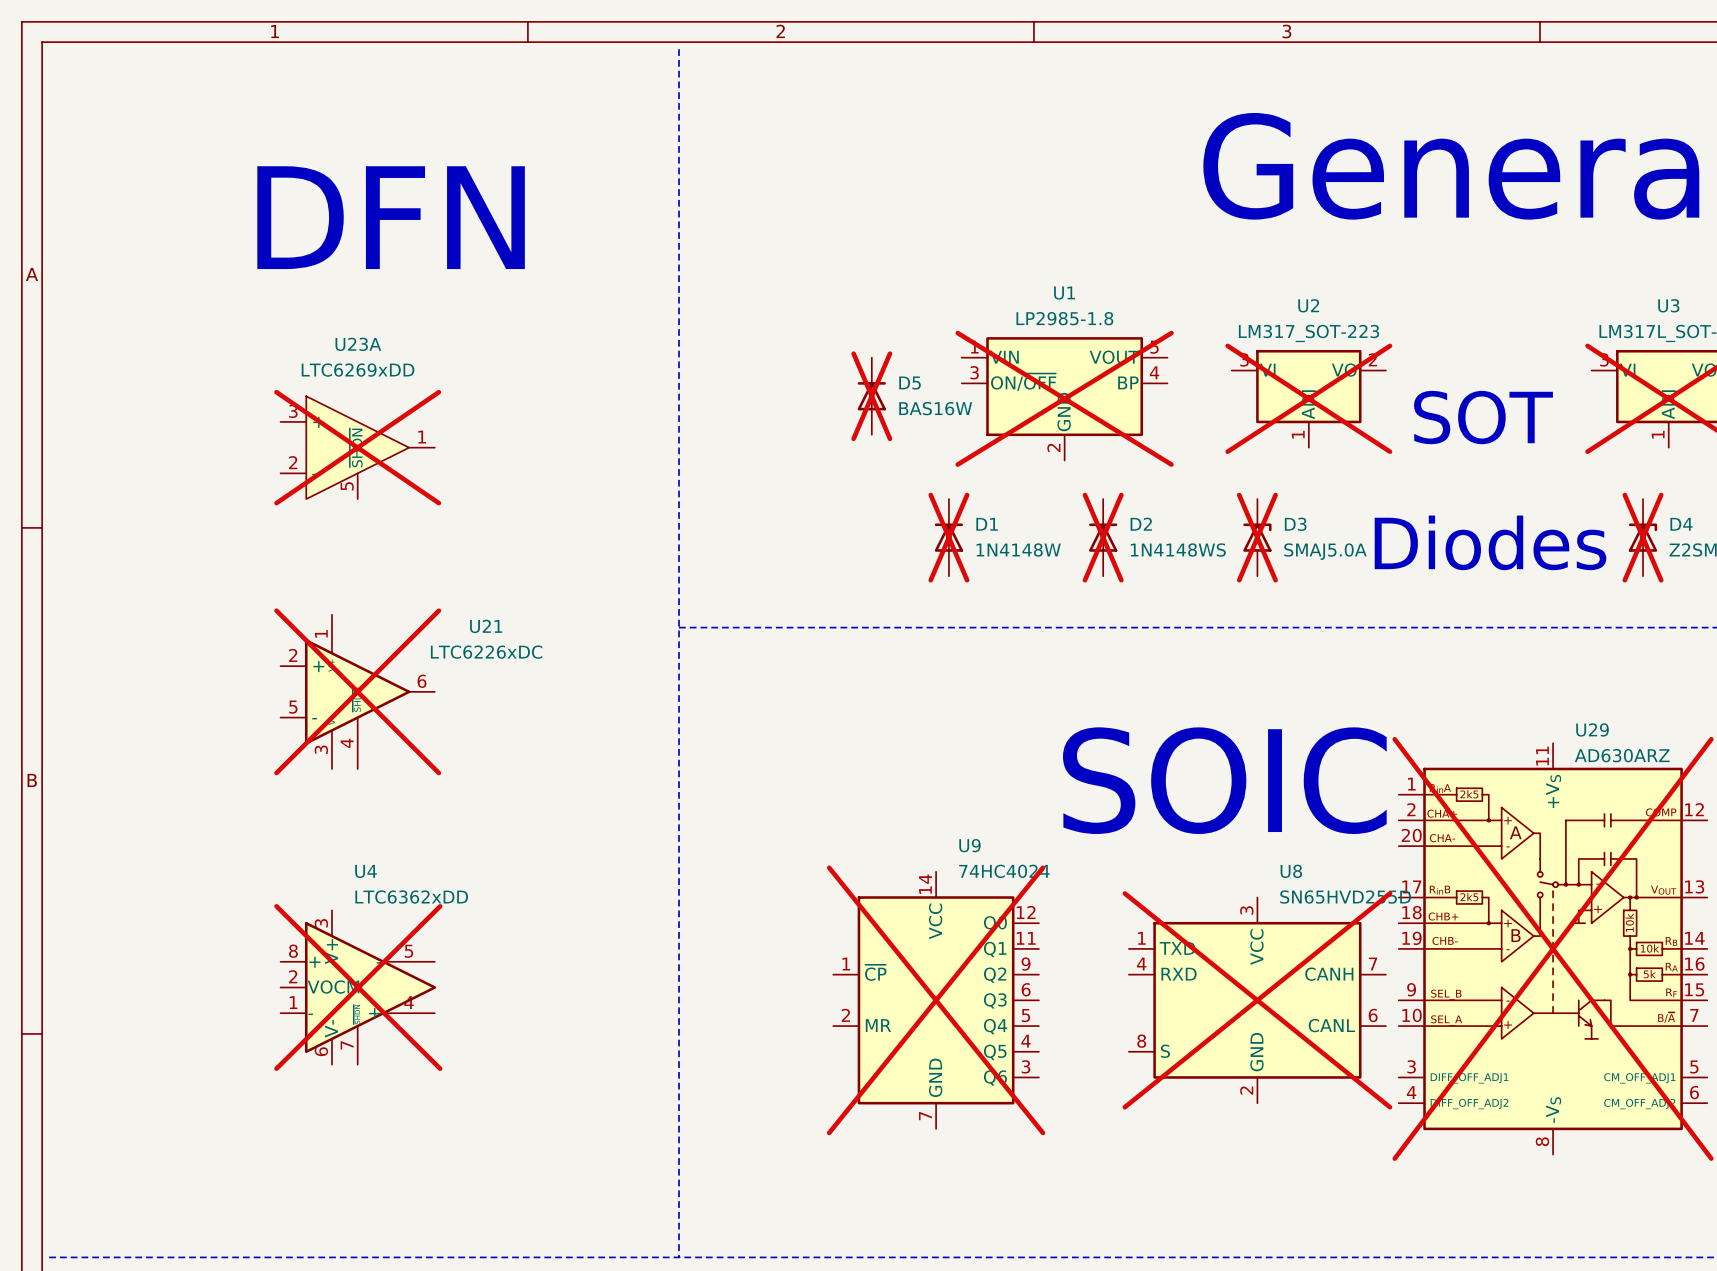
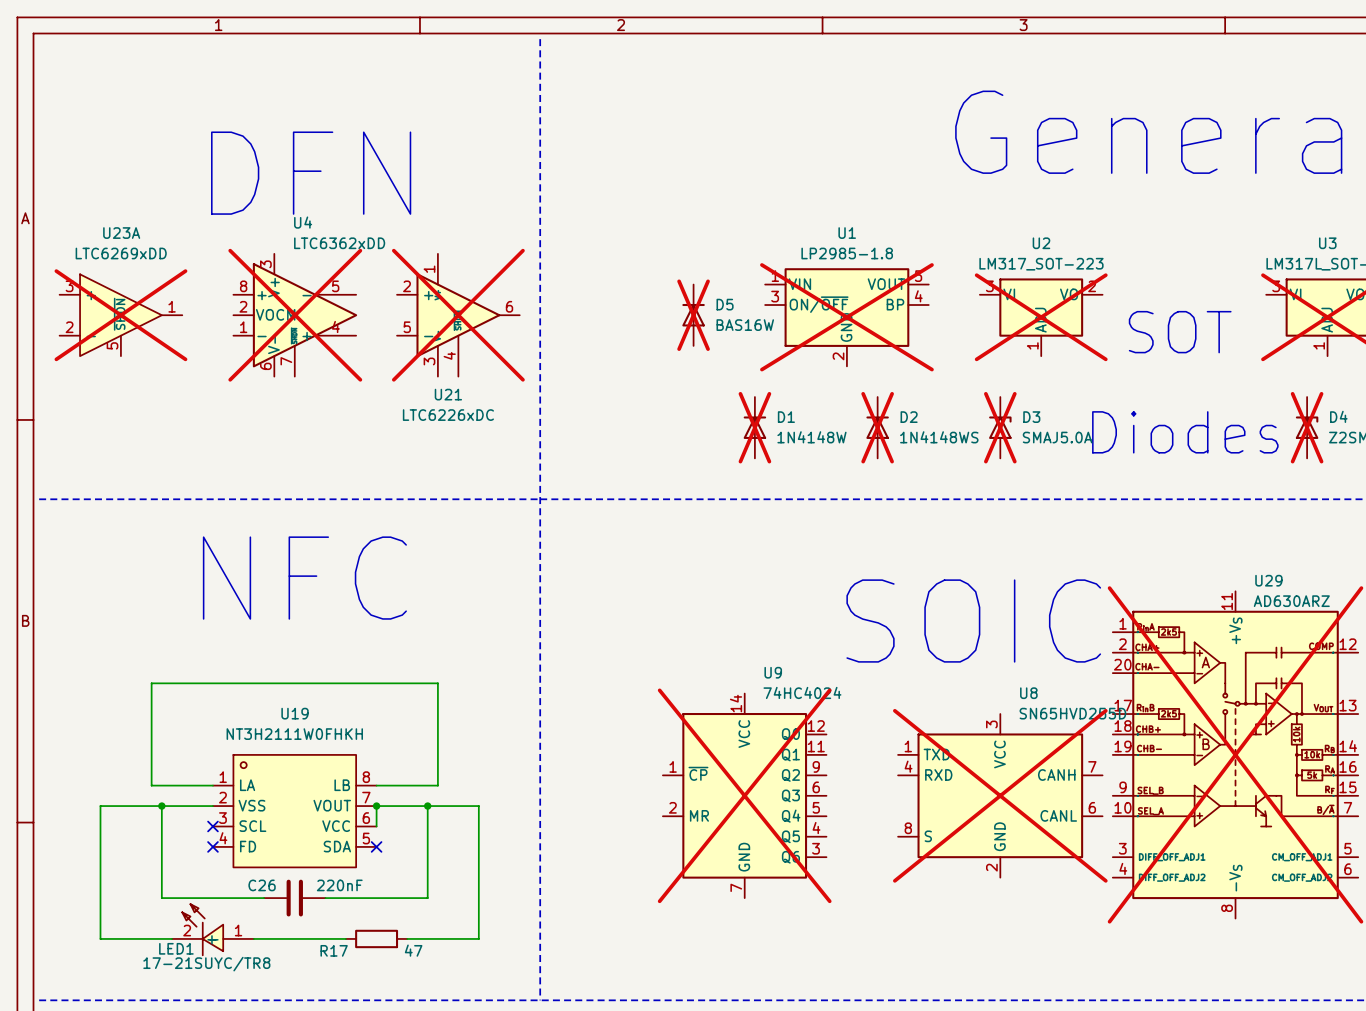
U23A position: (357, 447) -> (120, 315)
U21 name position: U21 (486, 626) -> U21 (448, 394)
line: none -> (39, 499) (540, 499)
U21 value position: LTC6226xDC (486, 652) -> LTC6226xDC (448, 415)
U21 position: (357, 691) -> (458, 315)
text: none -> NFC (304, 578)
wire: none -> (212, 785) (151, 785) (151, 683) (437, 683) (437, 785) (376, 785)
U4 position: (358, 987) -> (295, 315)
wire: none -> (161, 806) (161, 898) (264, 898)
junction: none -> (161, 806)
wire: none -> (212, 806) (100, 806) (100, 938) (172, 938)
junction: none -> (376, 806)
wire: none -> (427, 806) (427, 898) (325, 898)
junction: none -> (427, 806)
U19: none -> NT3H2111W0FHKH (294, 811)
no-connect mark: none -> (212, 826)
wire: none -> (376, 826) (376, 806) (478, 806) (478, 938) (407, 938)
no-connect mark: none -> (212, 846)
no-connect mark: none -> (376, 846)
C26: none -> 220nF (294, 898)
LED1: none -> 17-21SUYC/TR8 (212, 929)
wire: none -> (253, 938) (345, 938)
R17: none -> 47 (376, 938)

